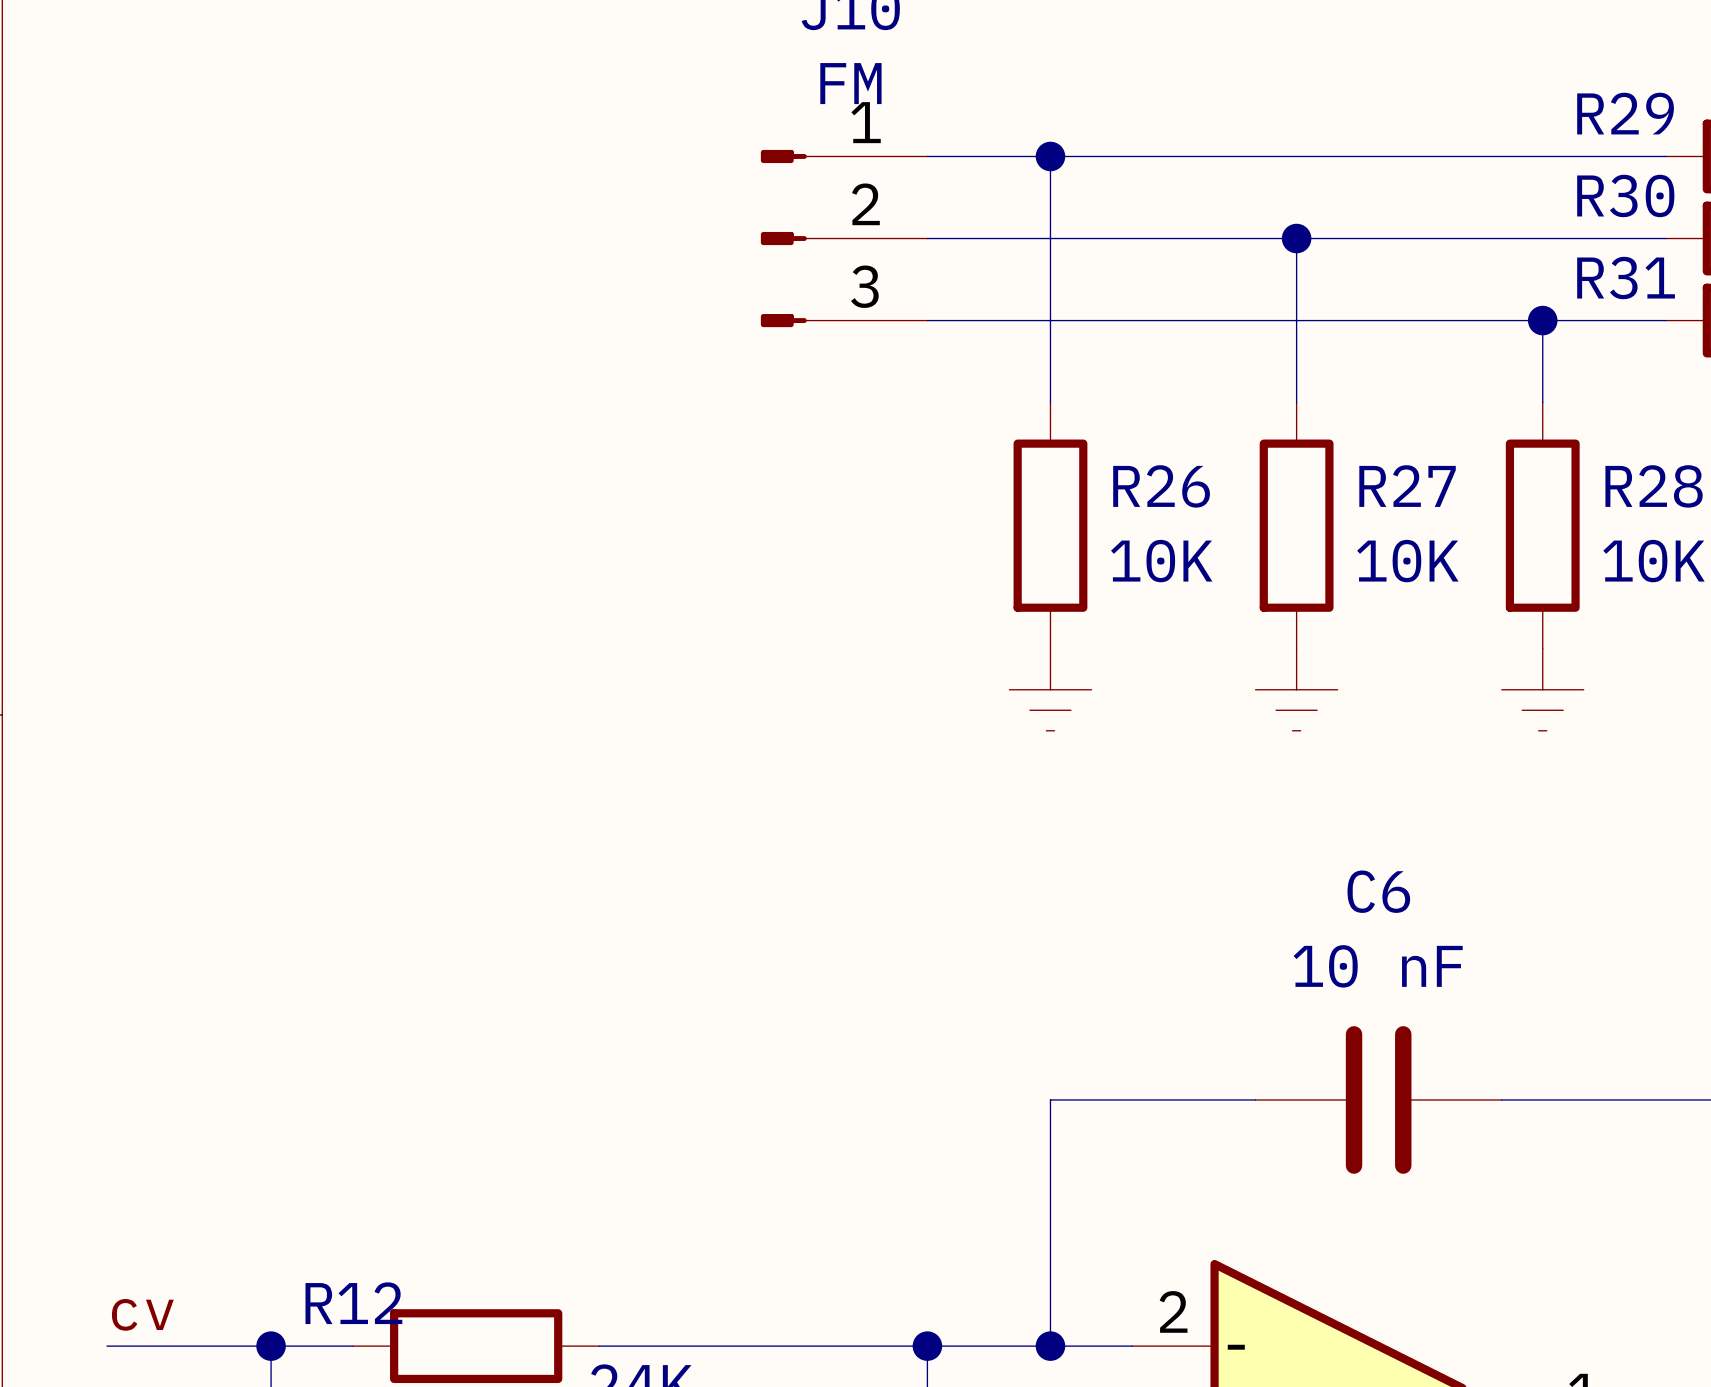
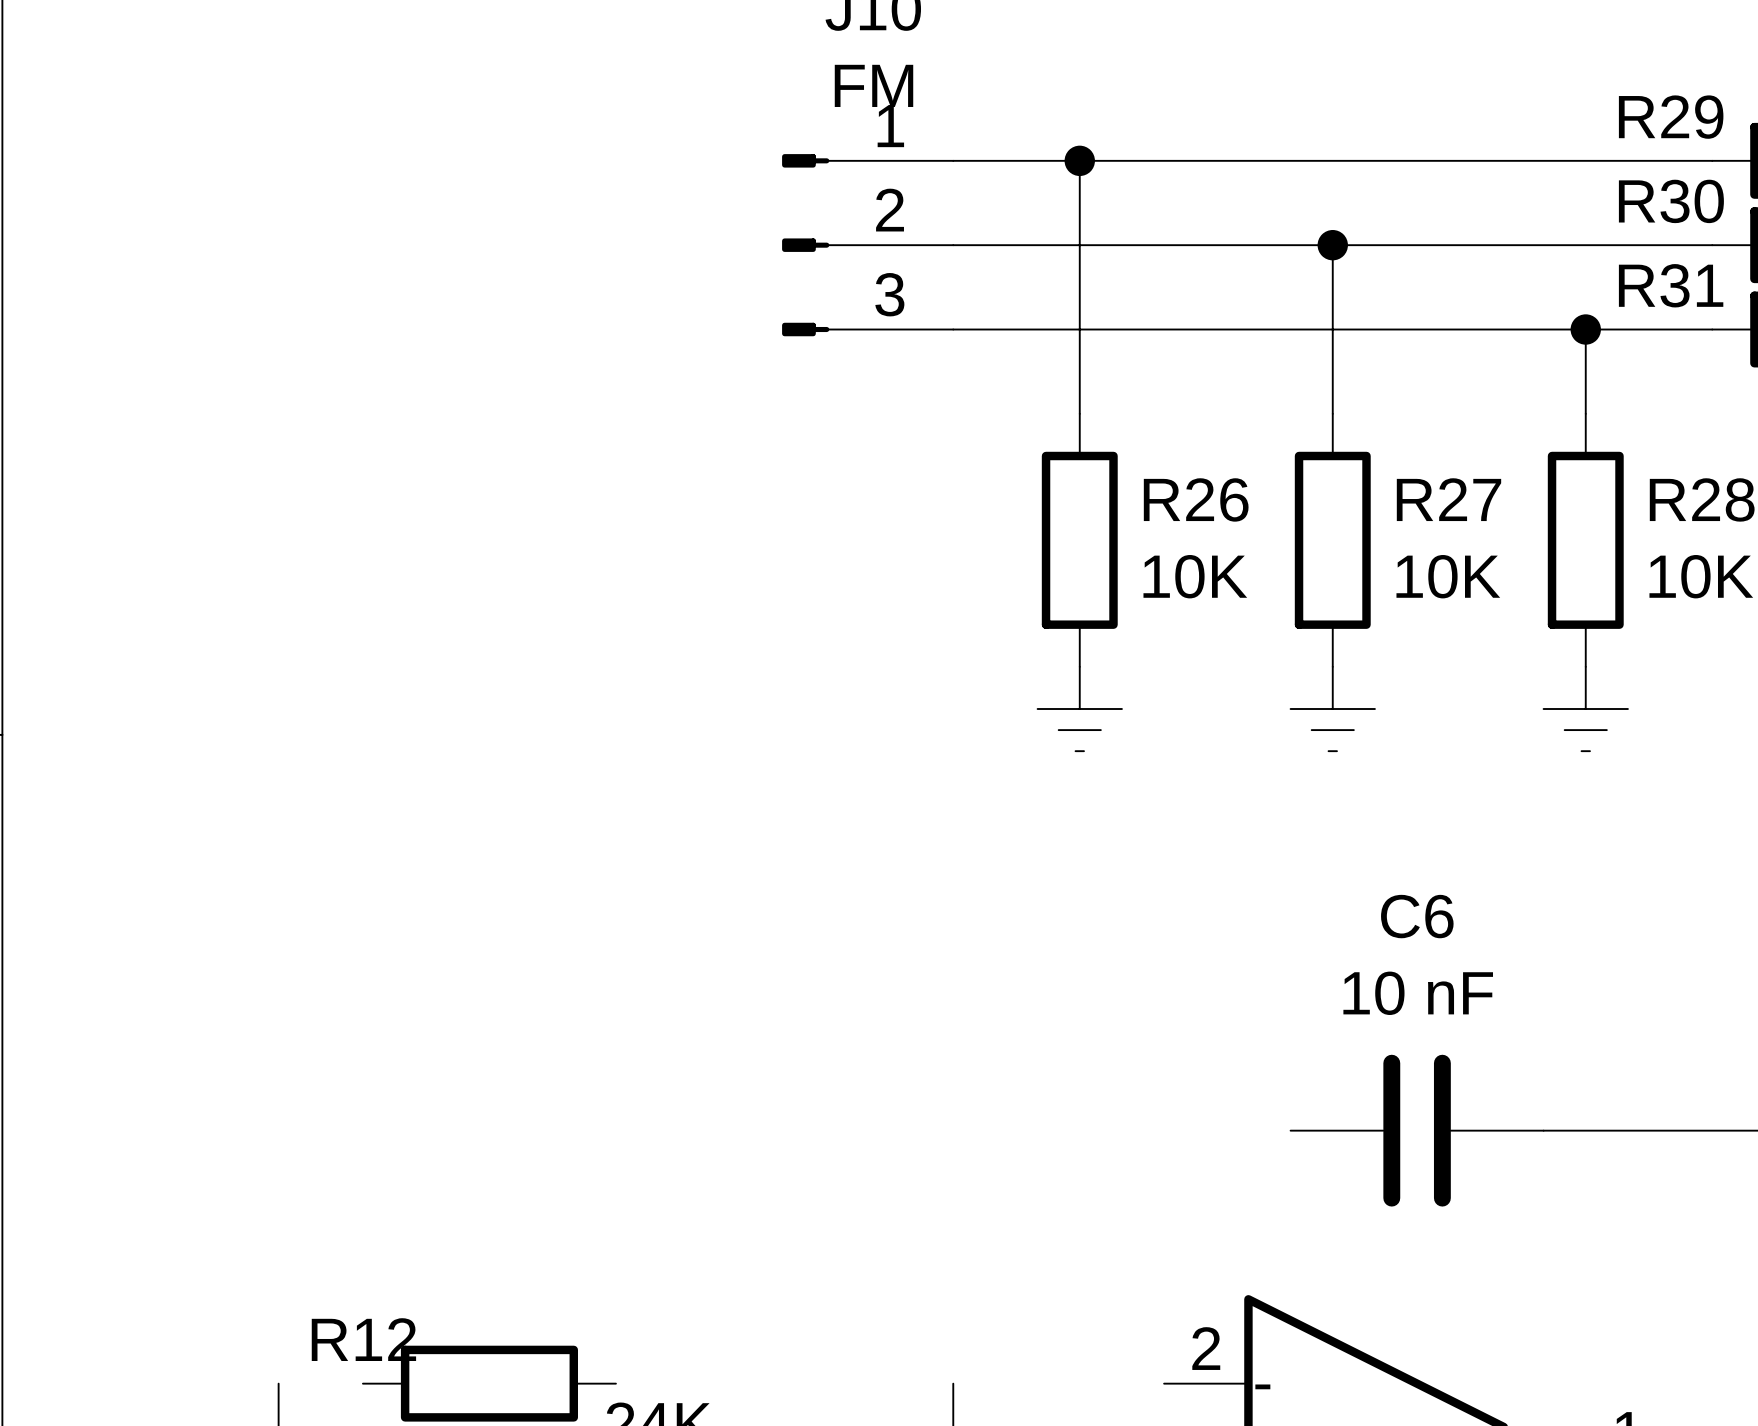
wire: (1255, 1099) (1050, 1099) (1050, 1346) -> none
label: cv (142, 1314) -> none
wire: (106, 1346) (353, 1346) -> none
junction: (271, 1346) -> none
wire: (599, 1346) (1132, 1346) -> none
junction: (927, 1346) -> none
junction: (1050, 1346) -> none

